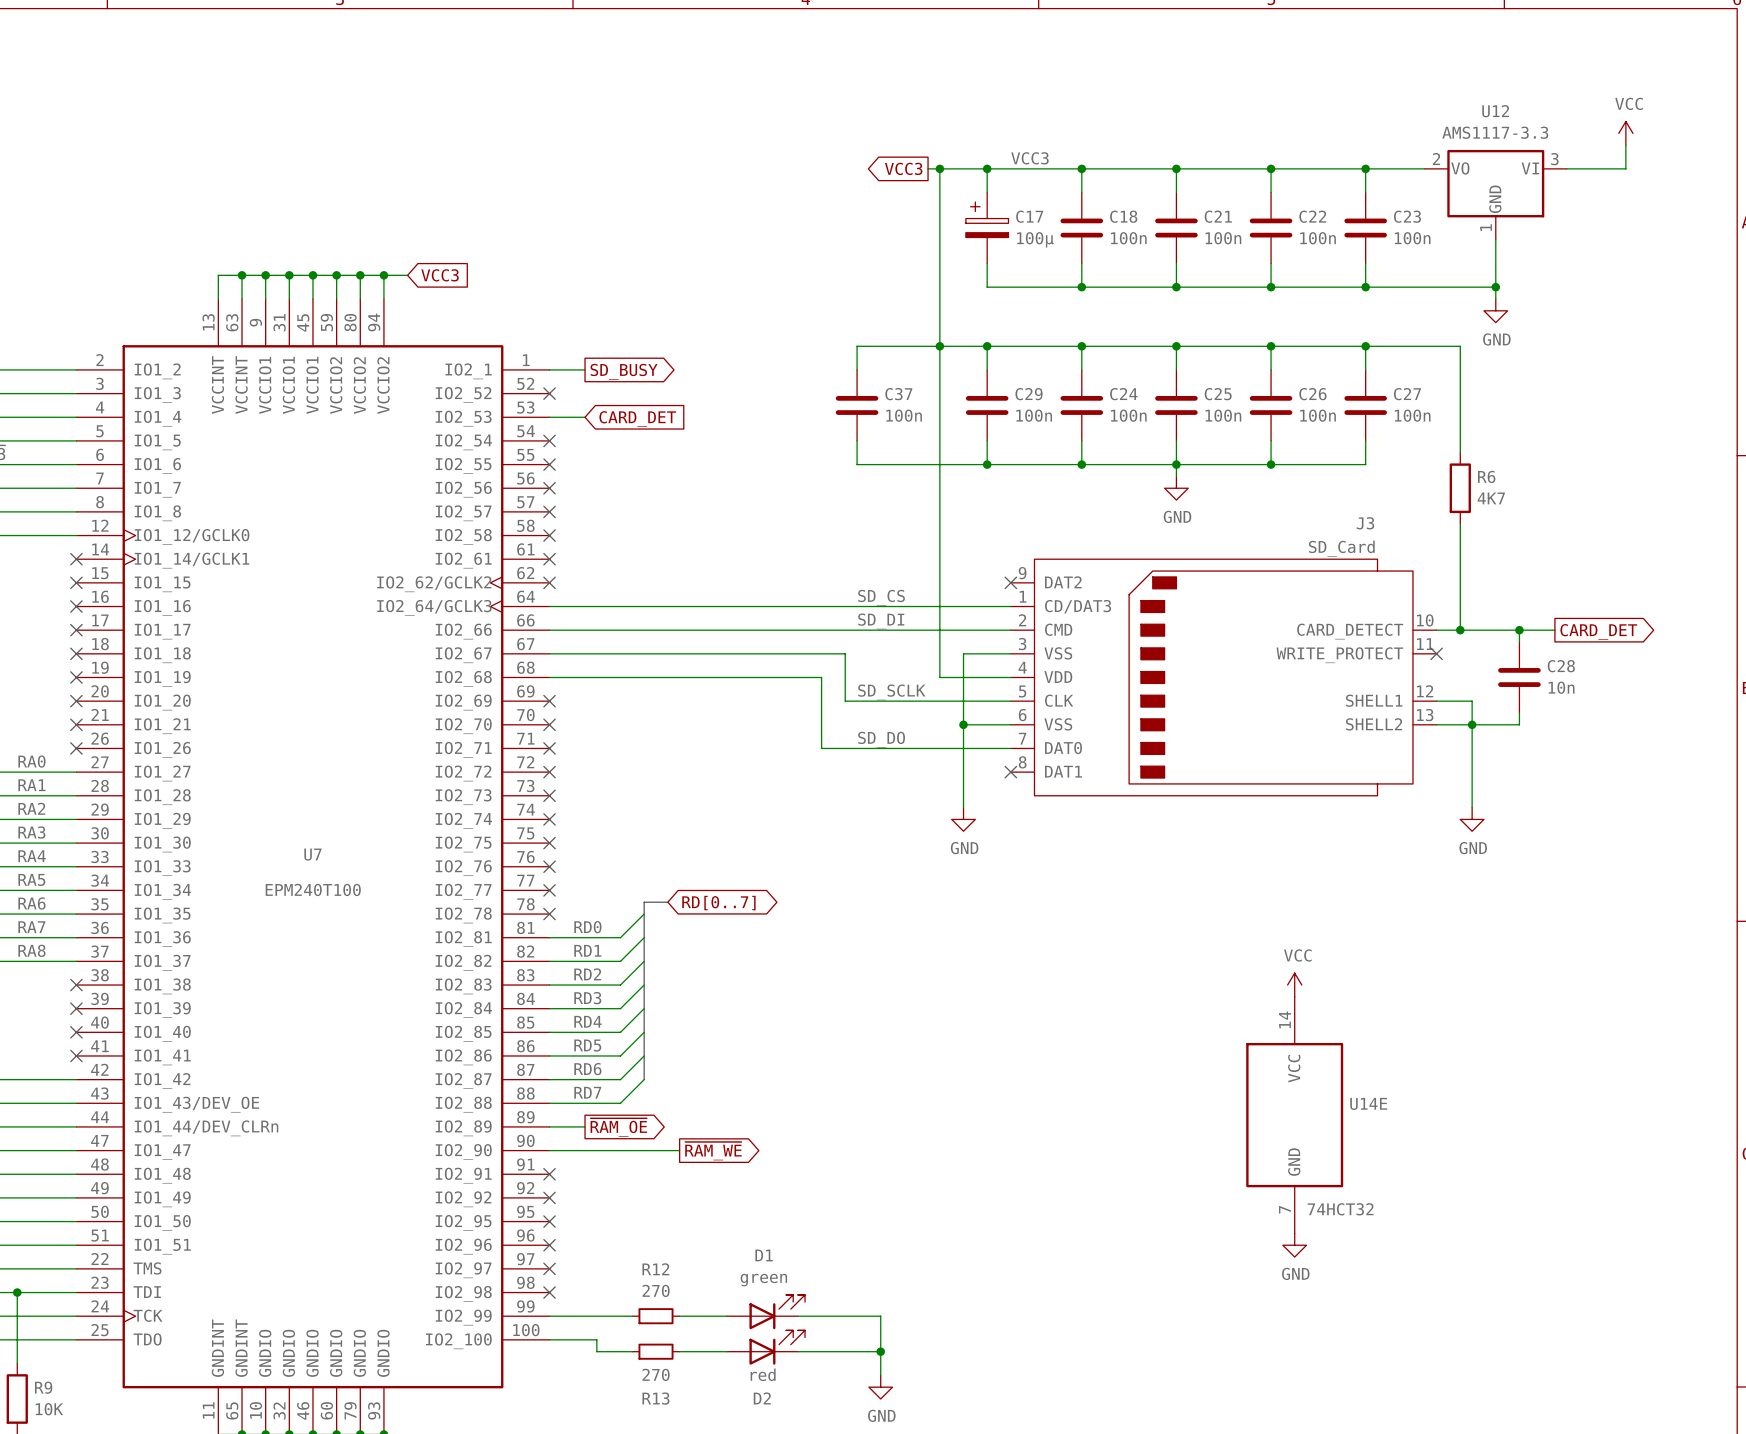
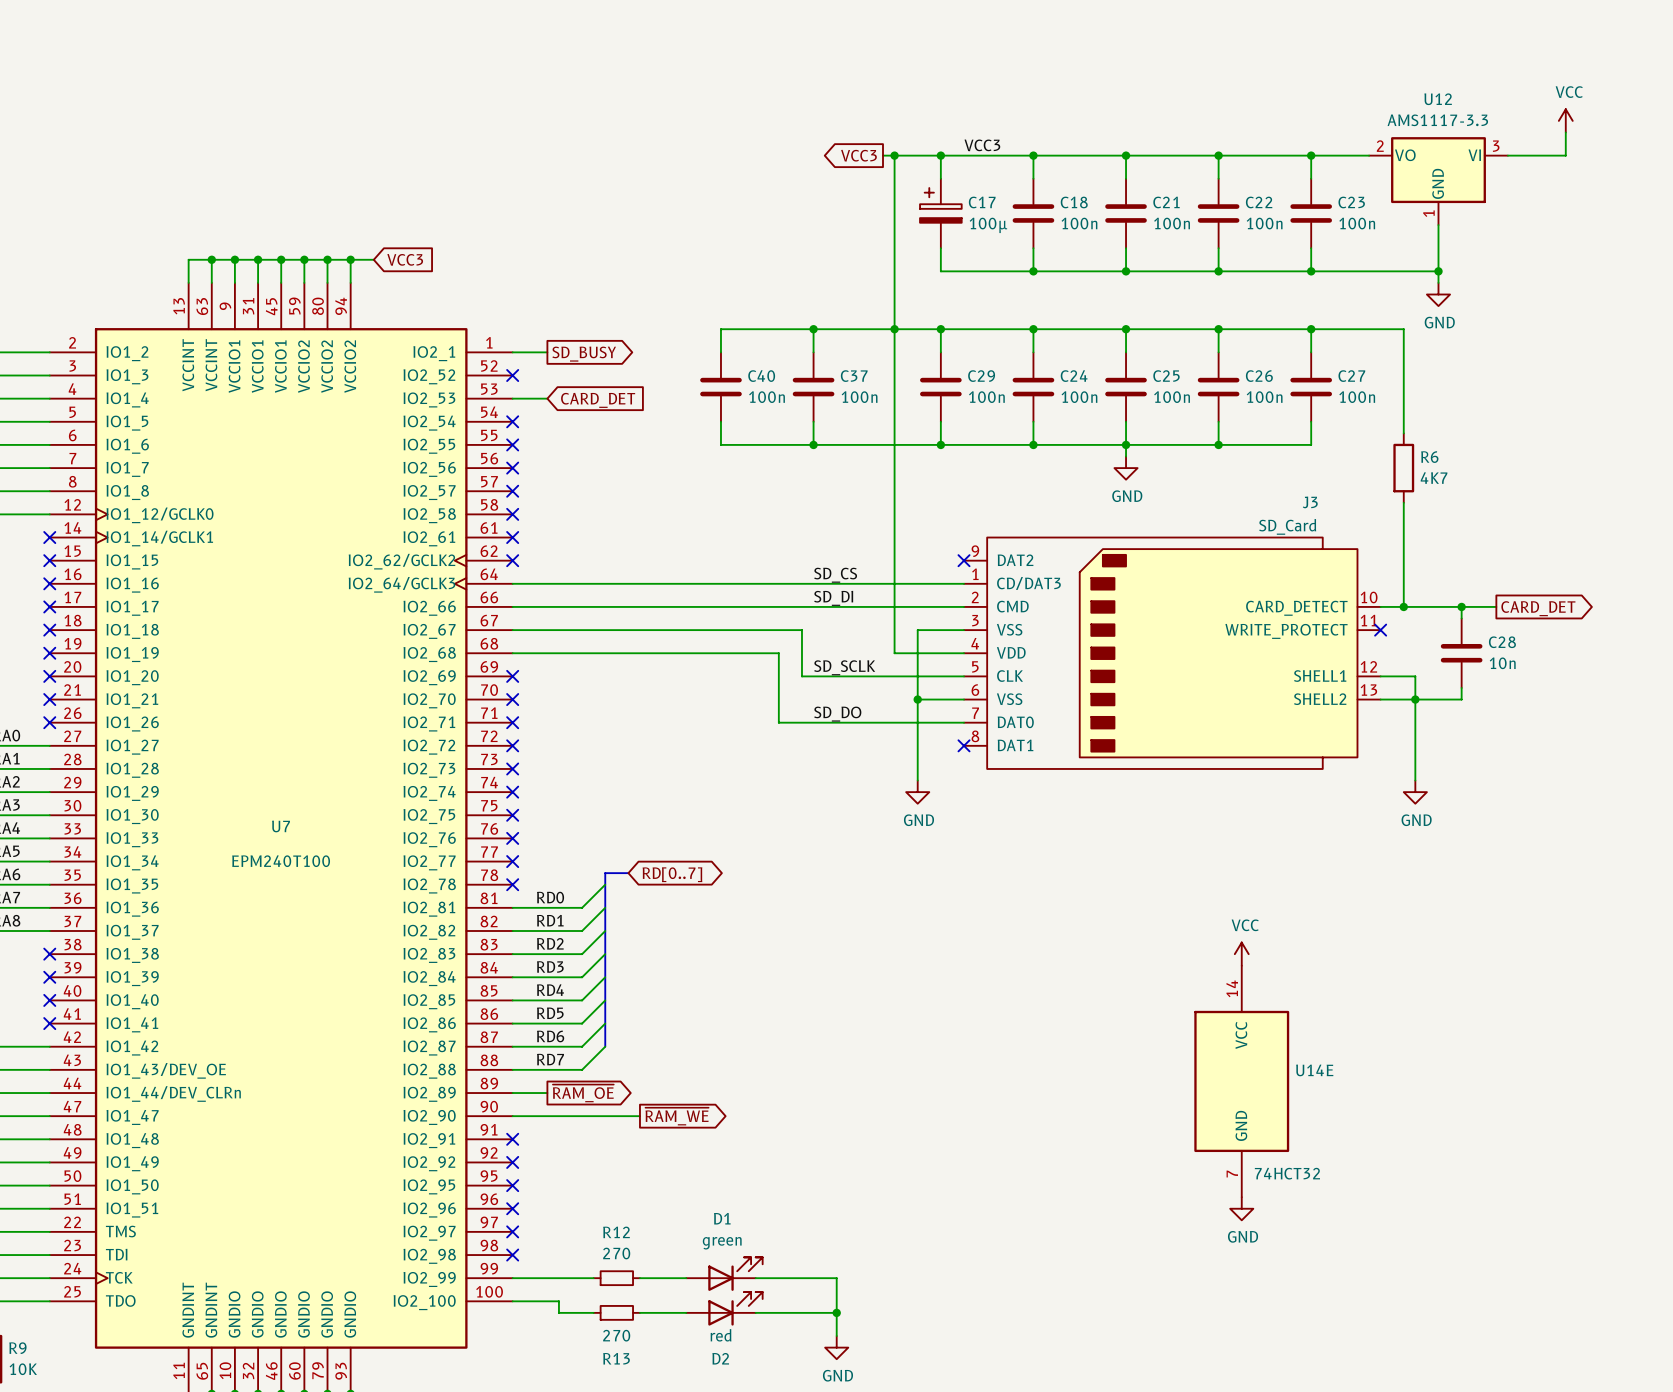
wire: none -> (813, 329) (720, 329) (720, 352)
junction: none -> (813, 329)
C40: none -> 100n (720, 387)
wire: none -> (720, 421) (720, 444) (813, 444)
junction: none -> (813, 444)

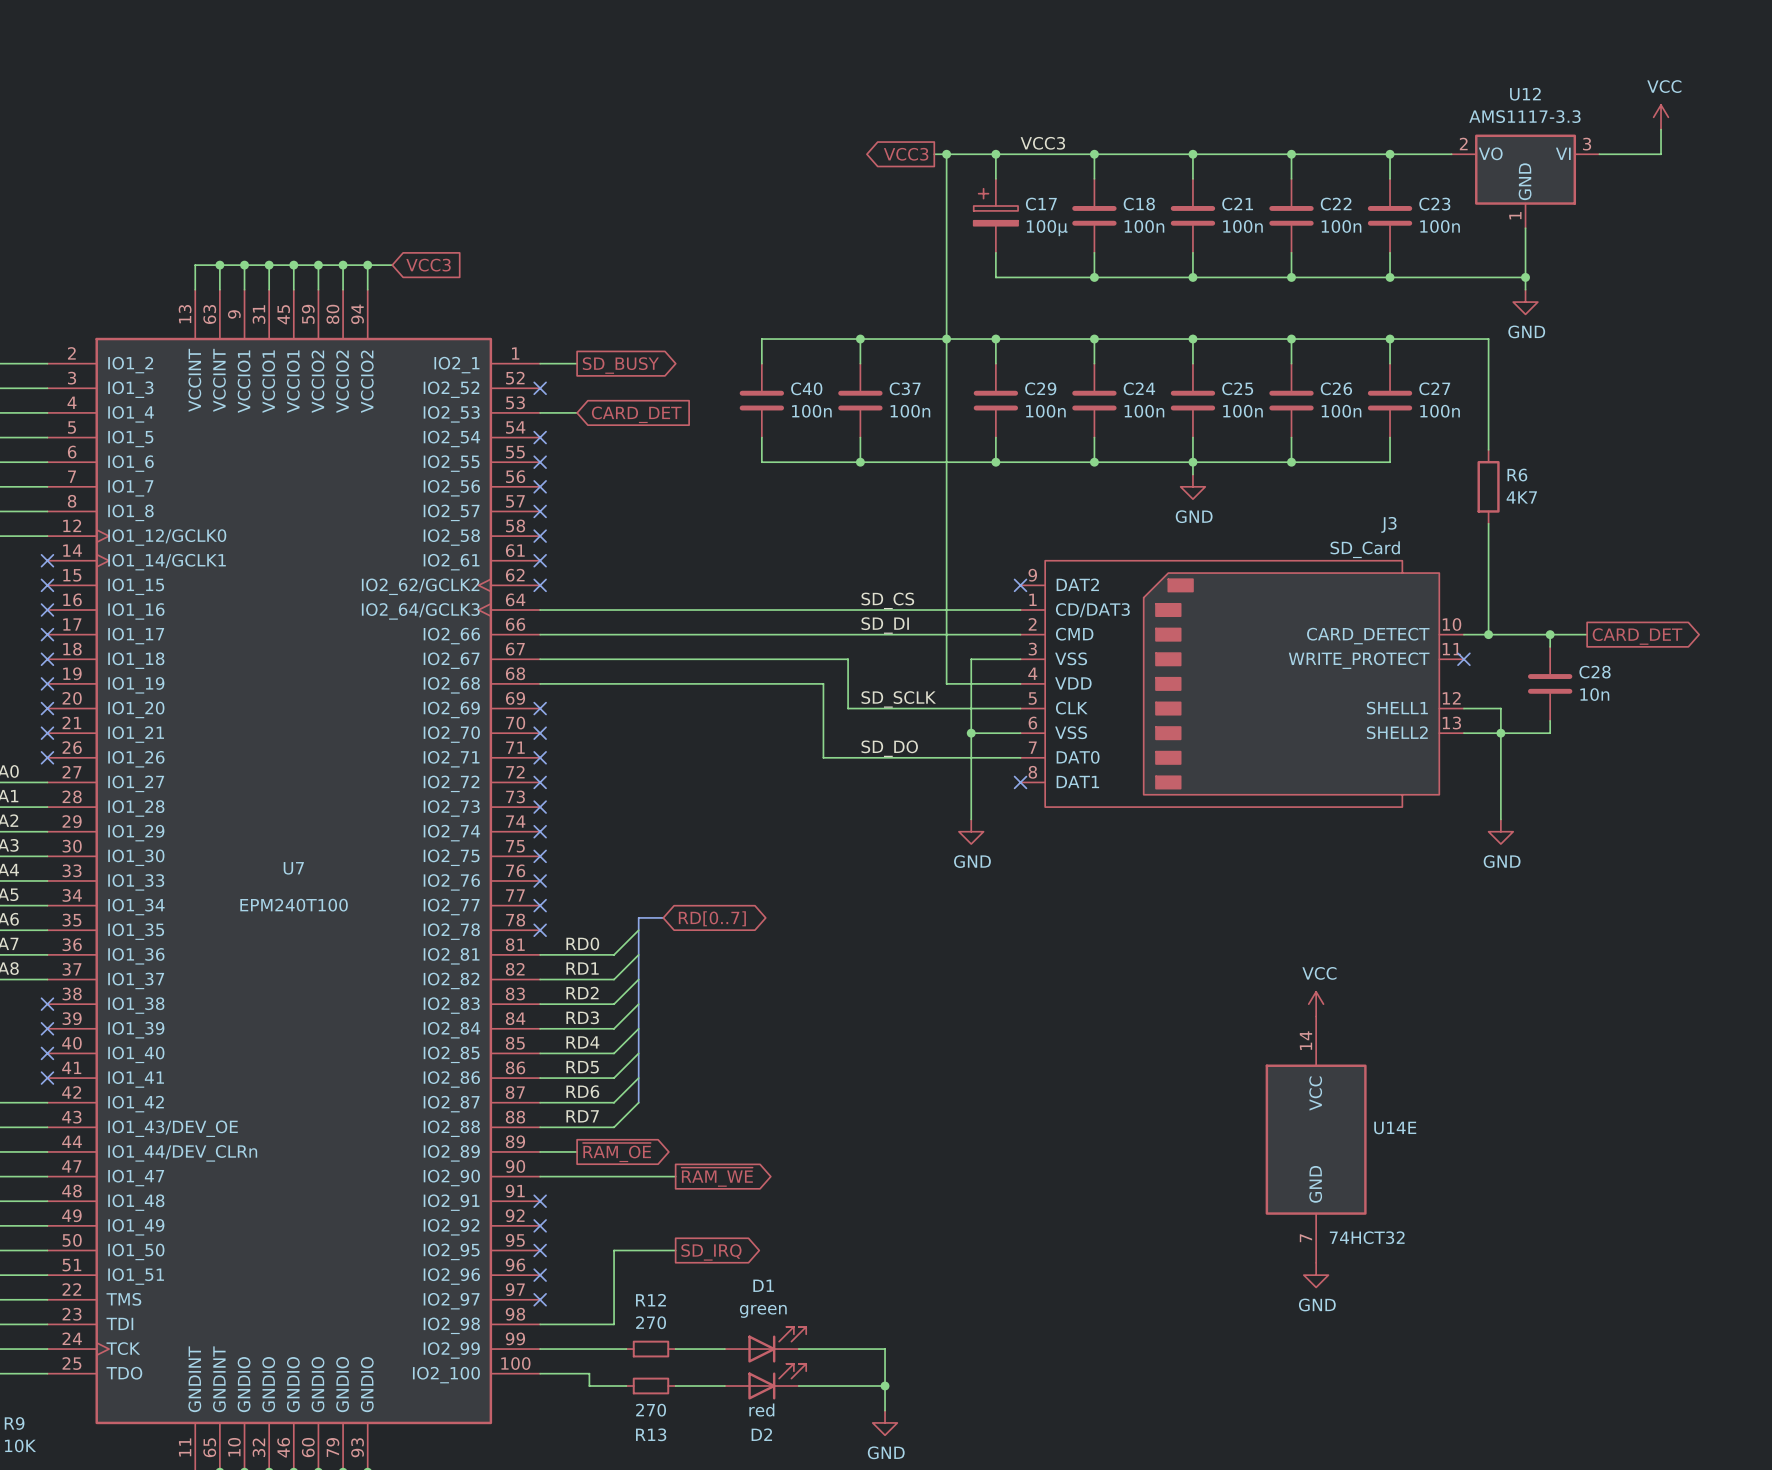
wire: none -> (675, 1250) (614, 1250) (614, 1324) (540, 1324)
global label: none -> SD_IRQ (711, 1252)
no-connect mark: (512, 1255) -> none

